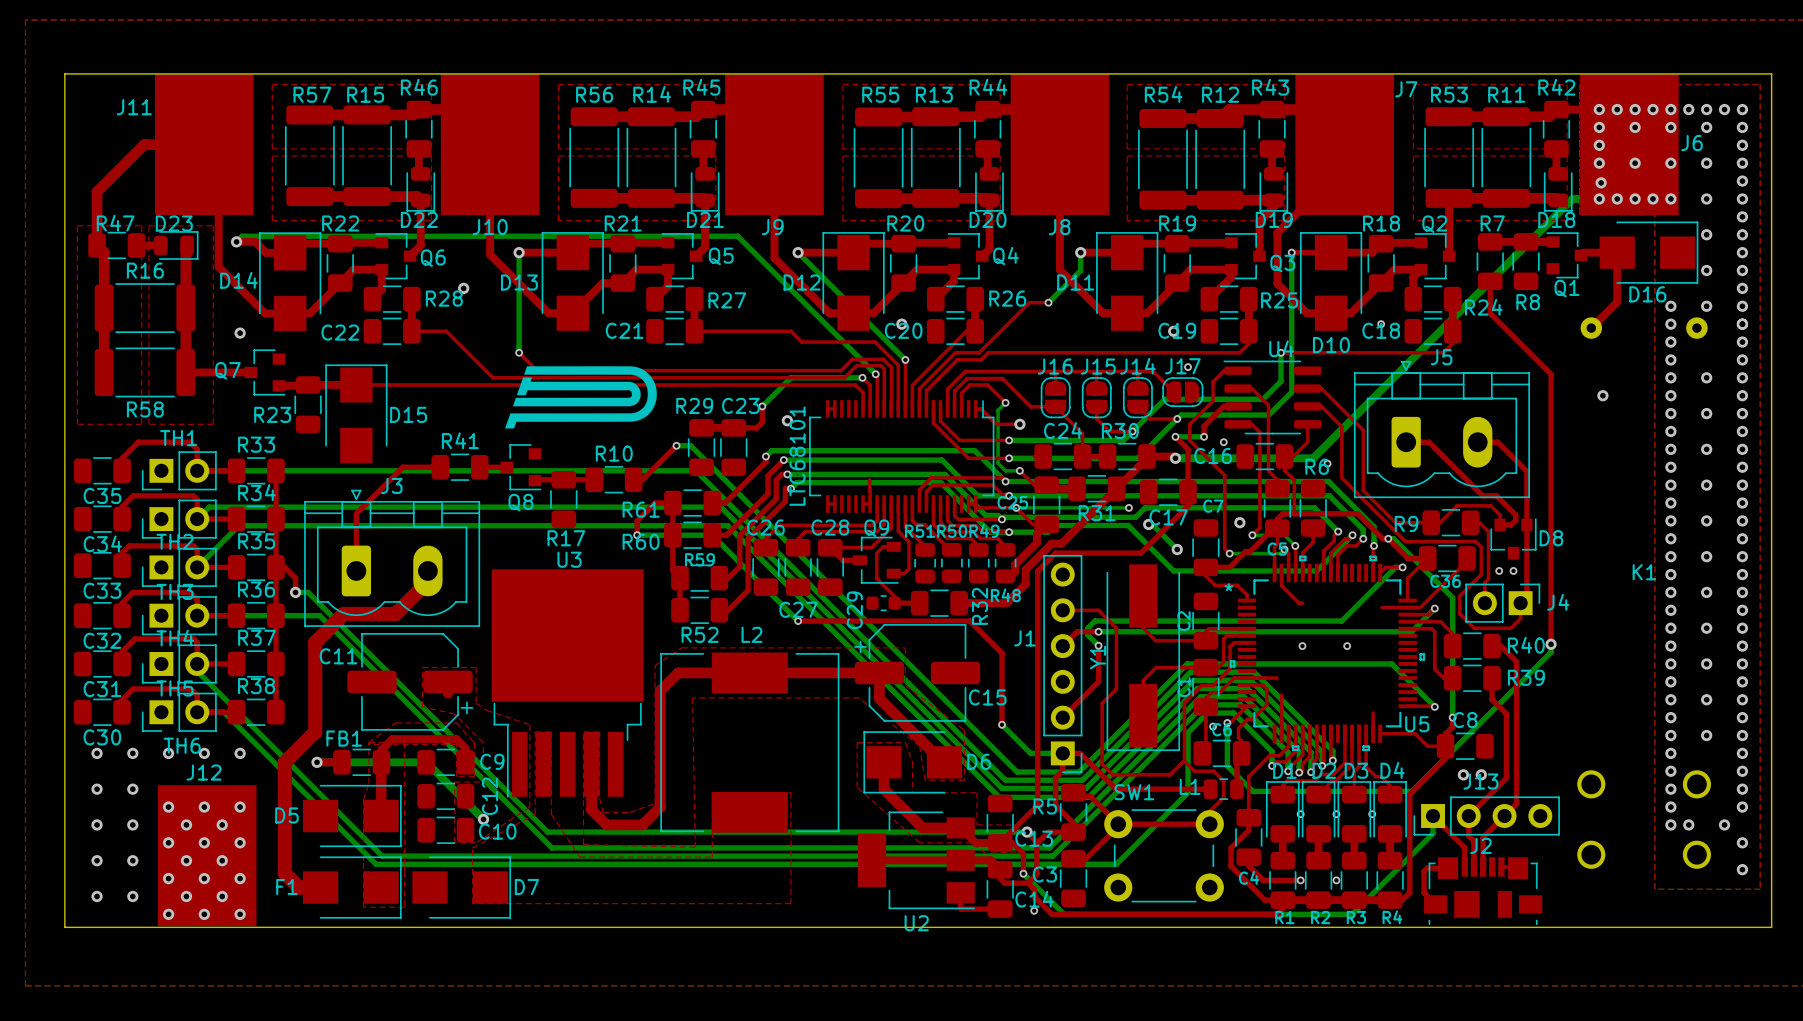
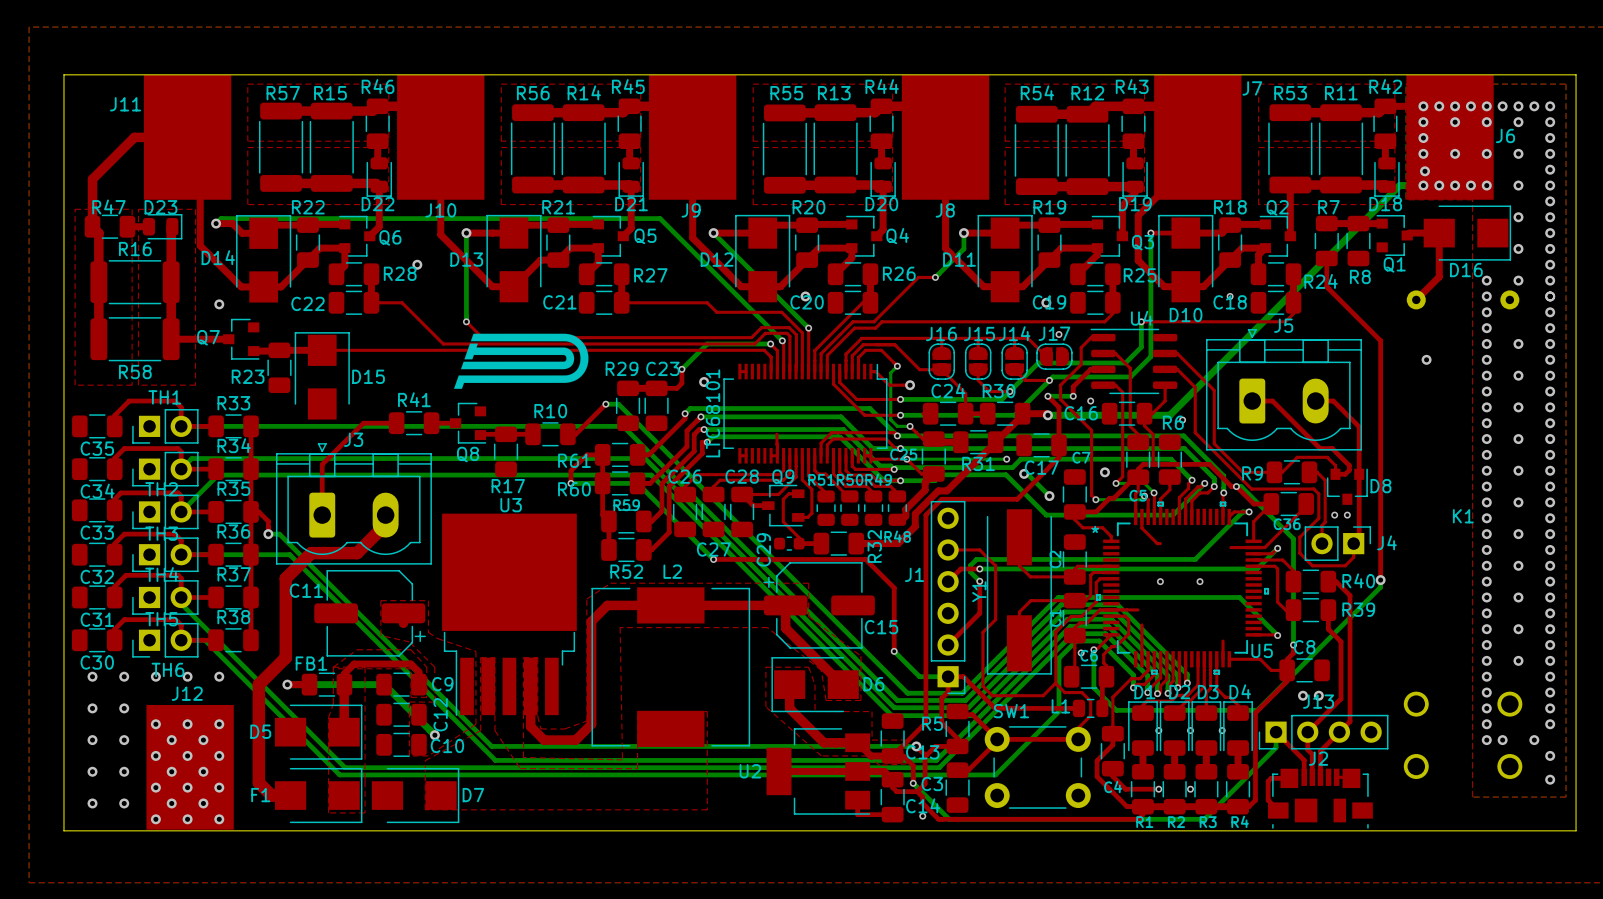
U2 name position: U2 (916, 923) -> U2 (750, 771)

